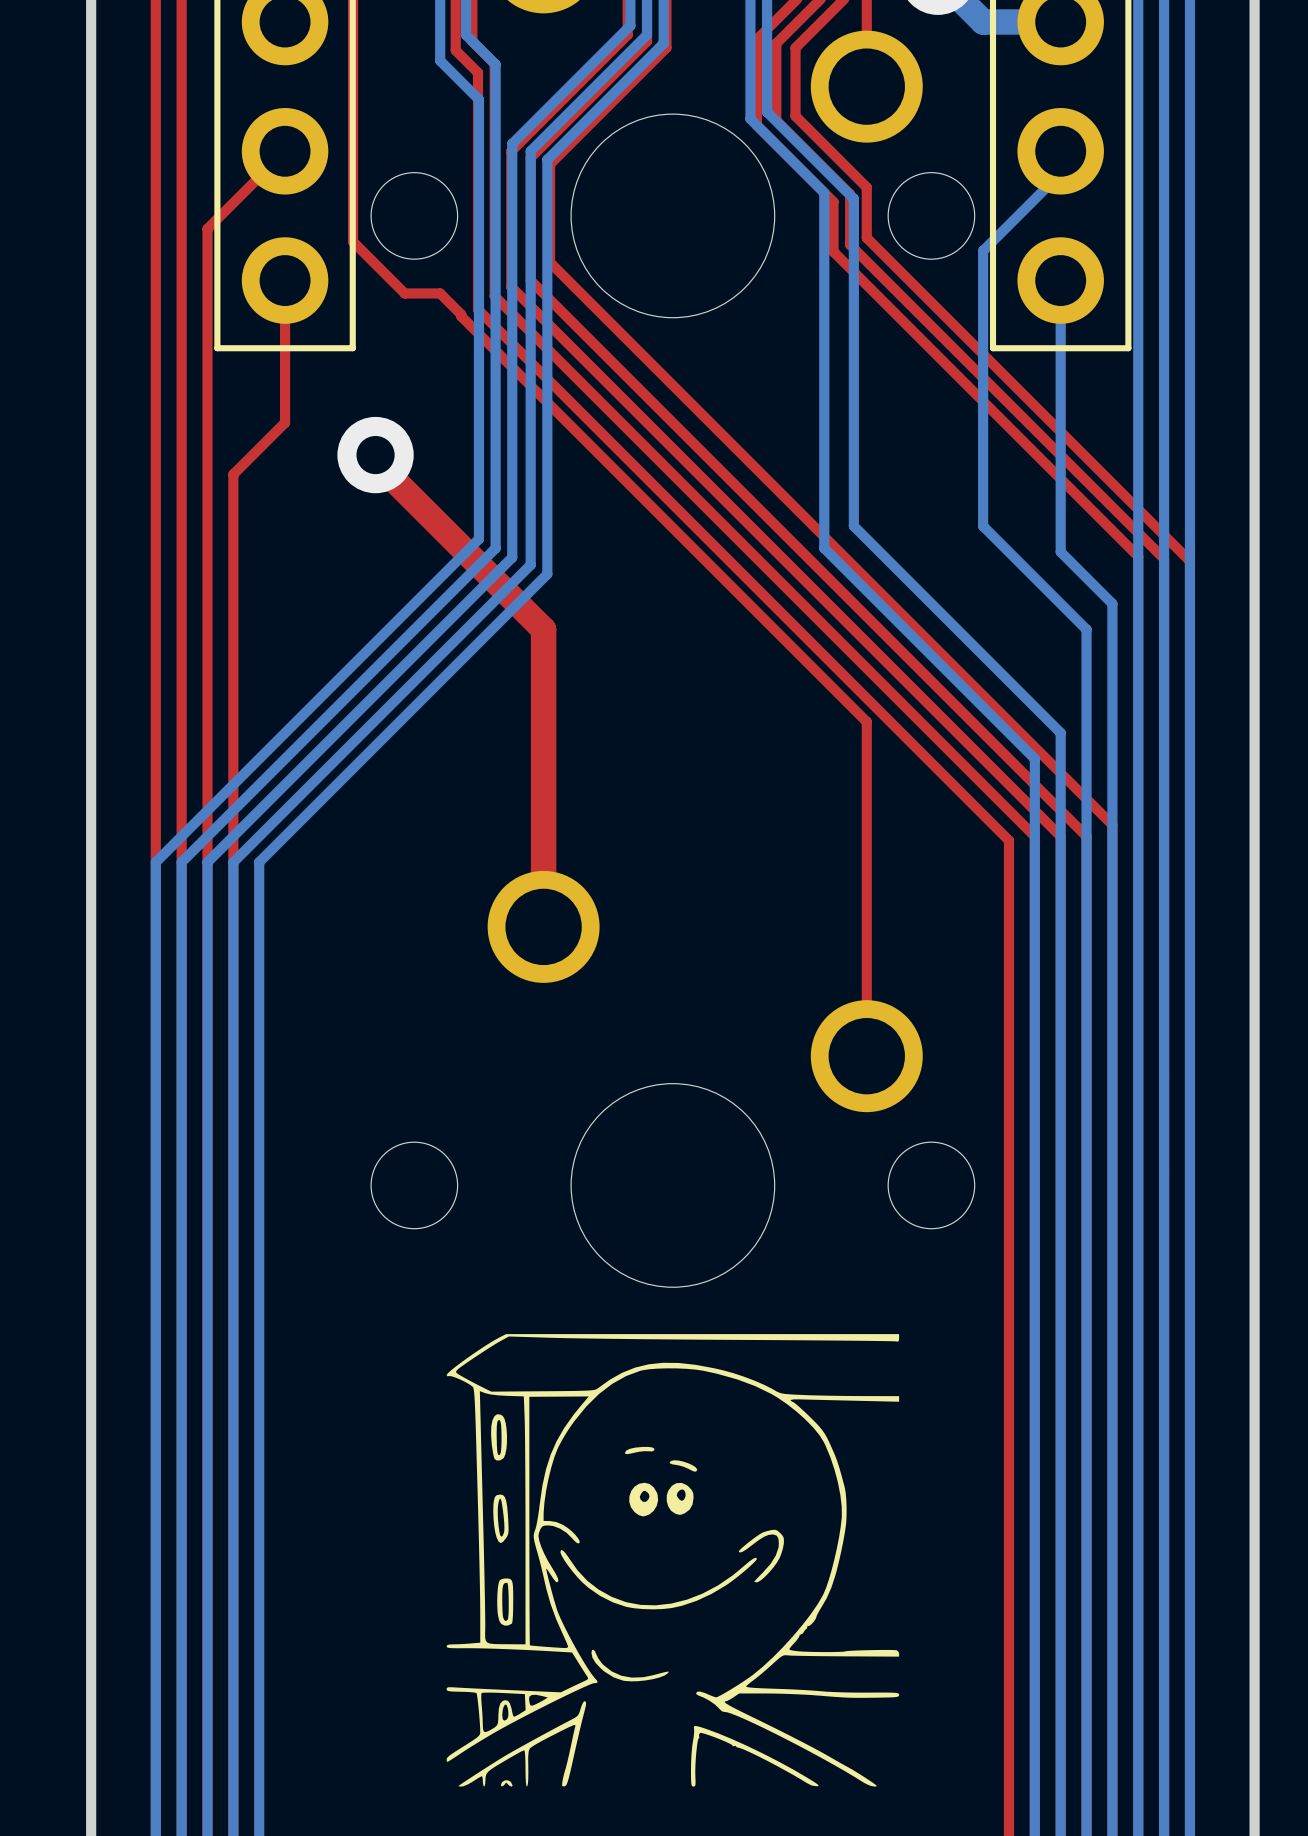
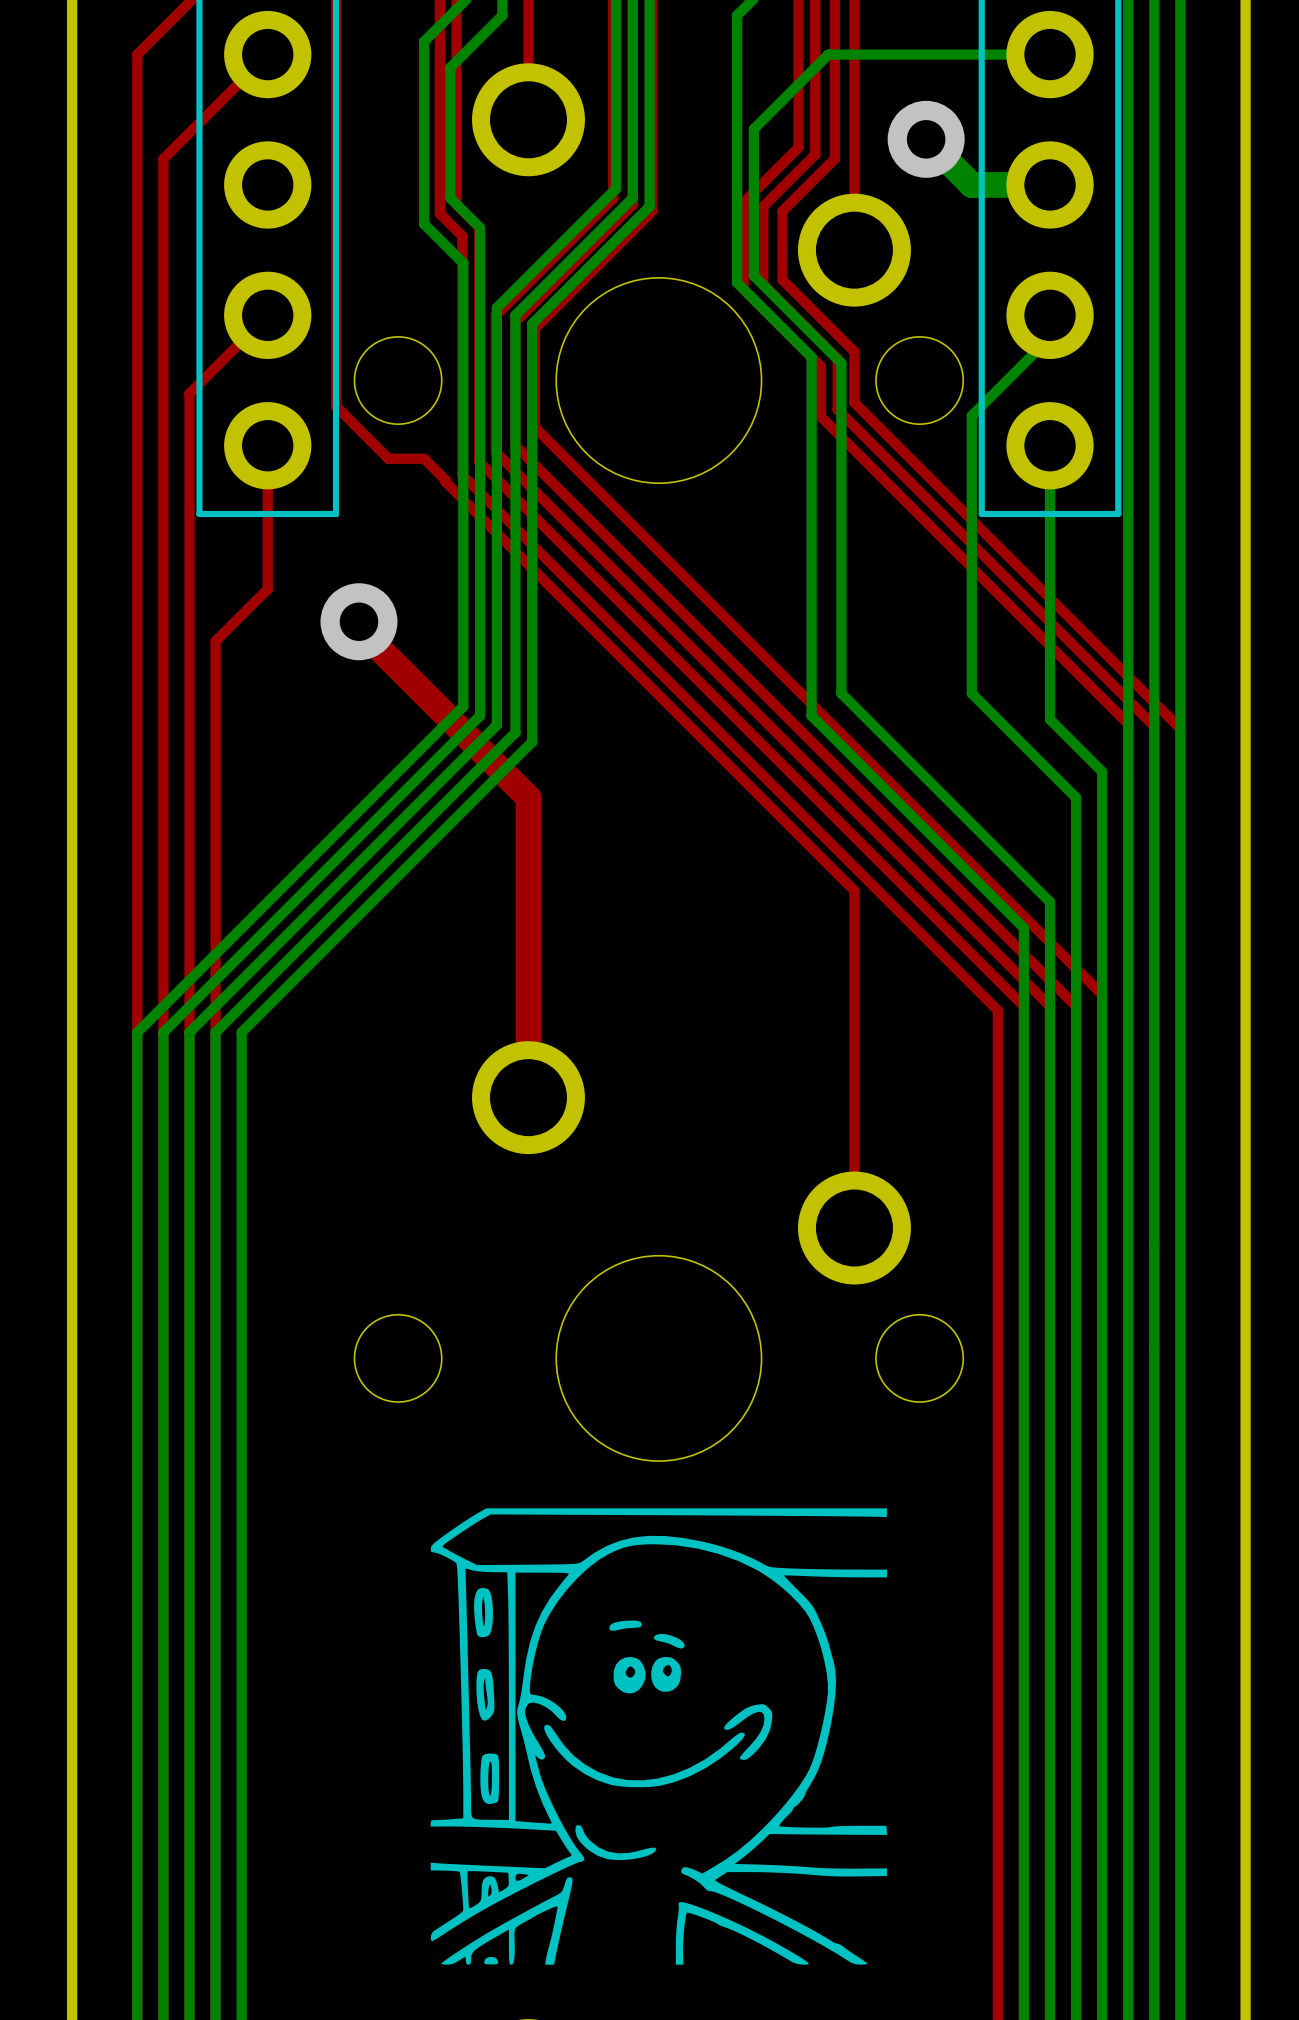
drawing shape: [446, 1334, 900, 1787] -> [430, 1508, 888, 1965]

